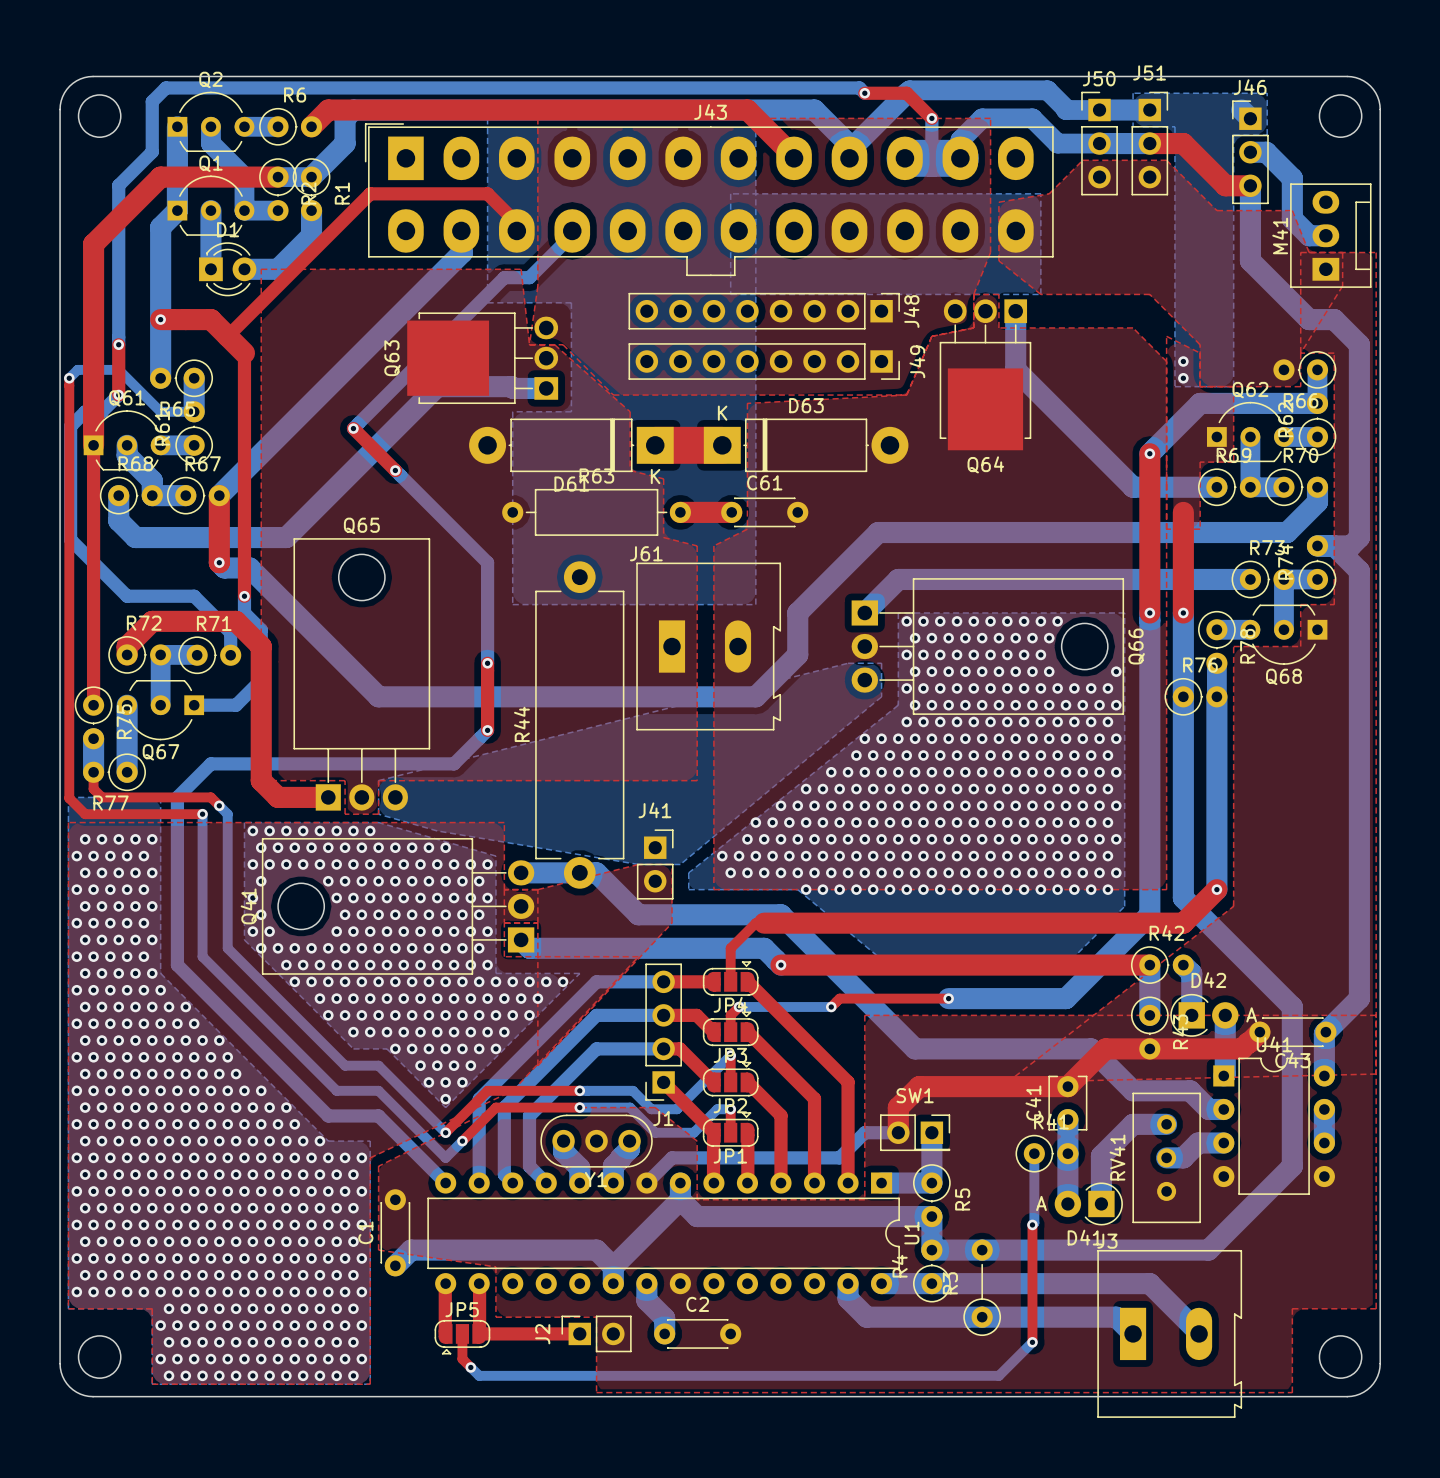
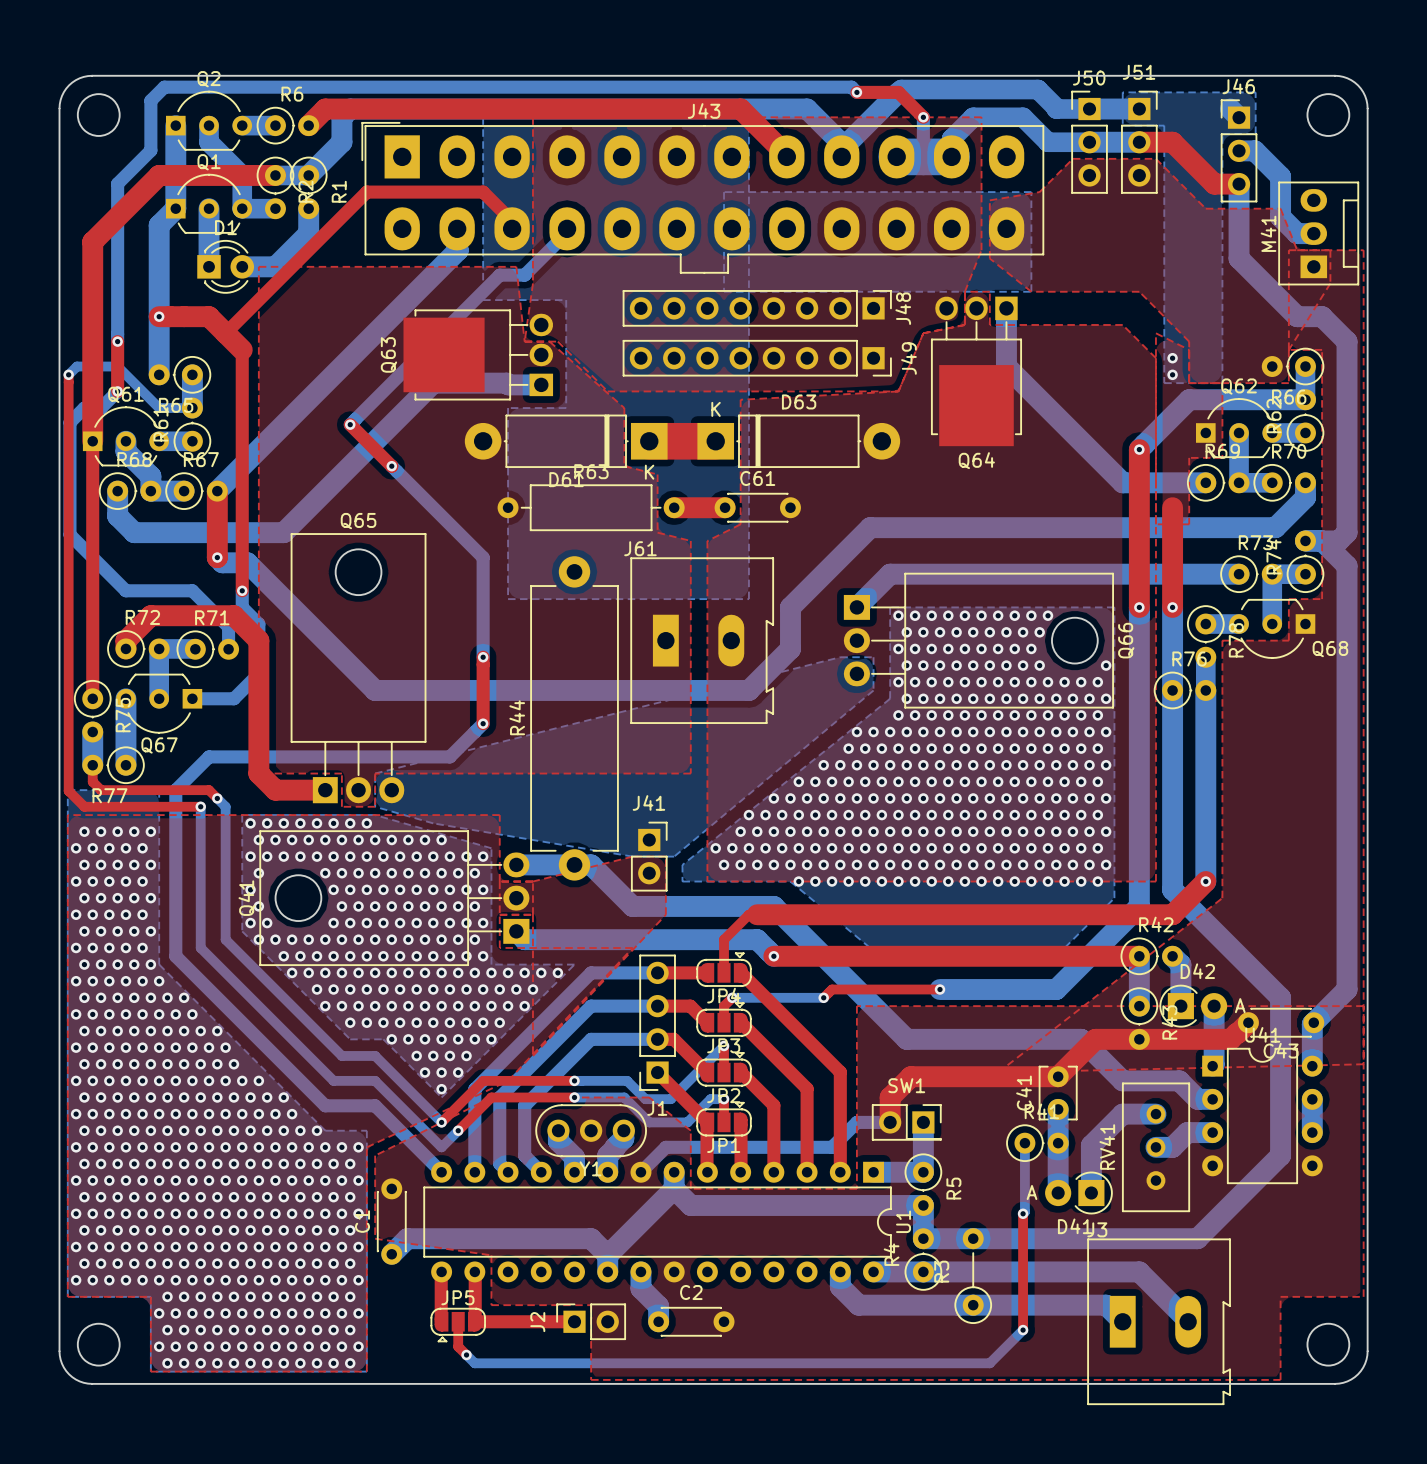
Q68 name position: Q68 (1283, 676) -> Q68 (1330, 649)

